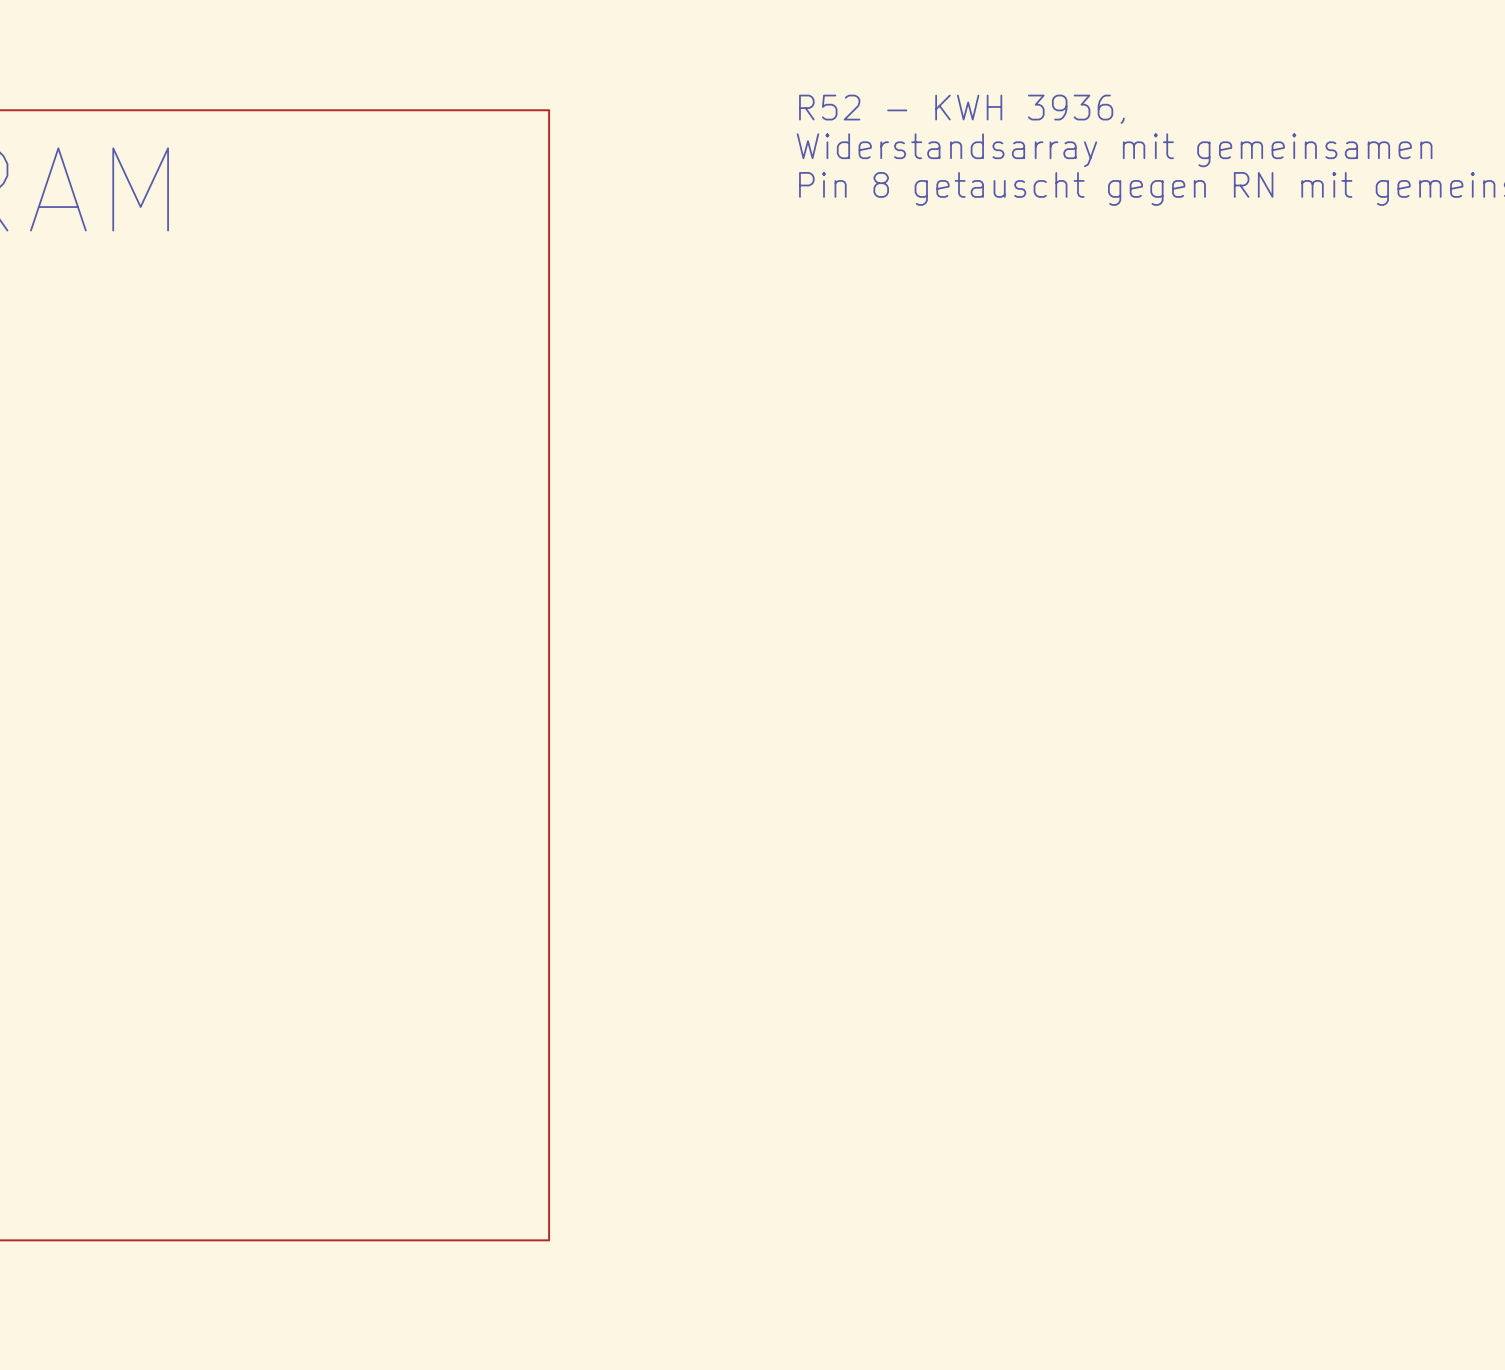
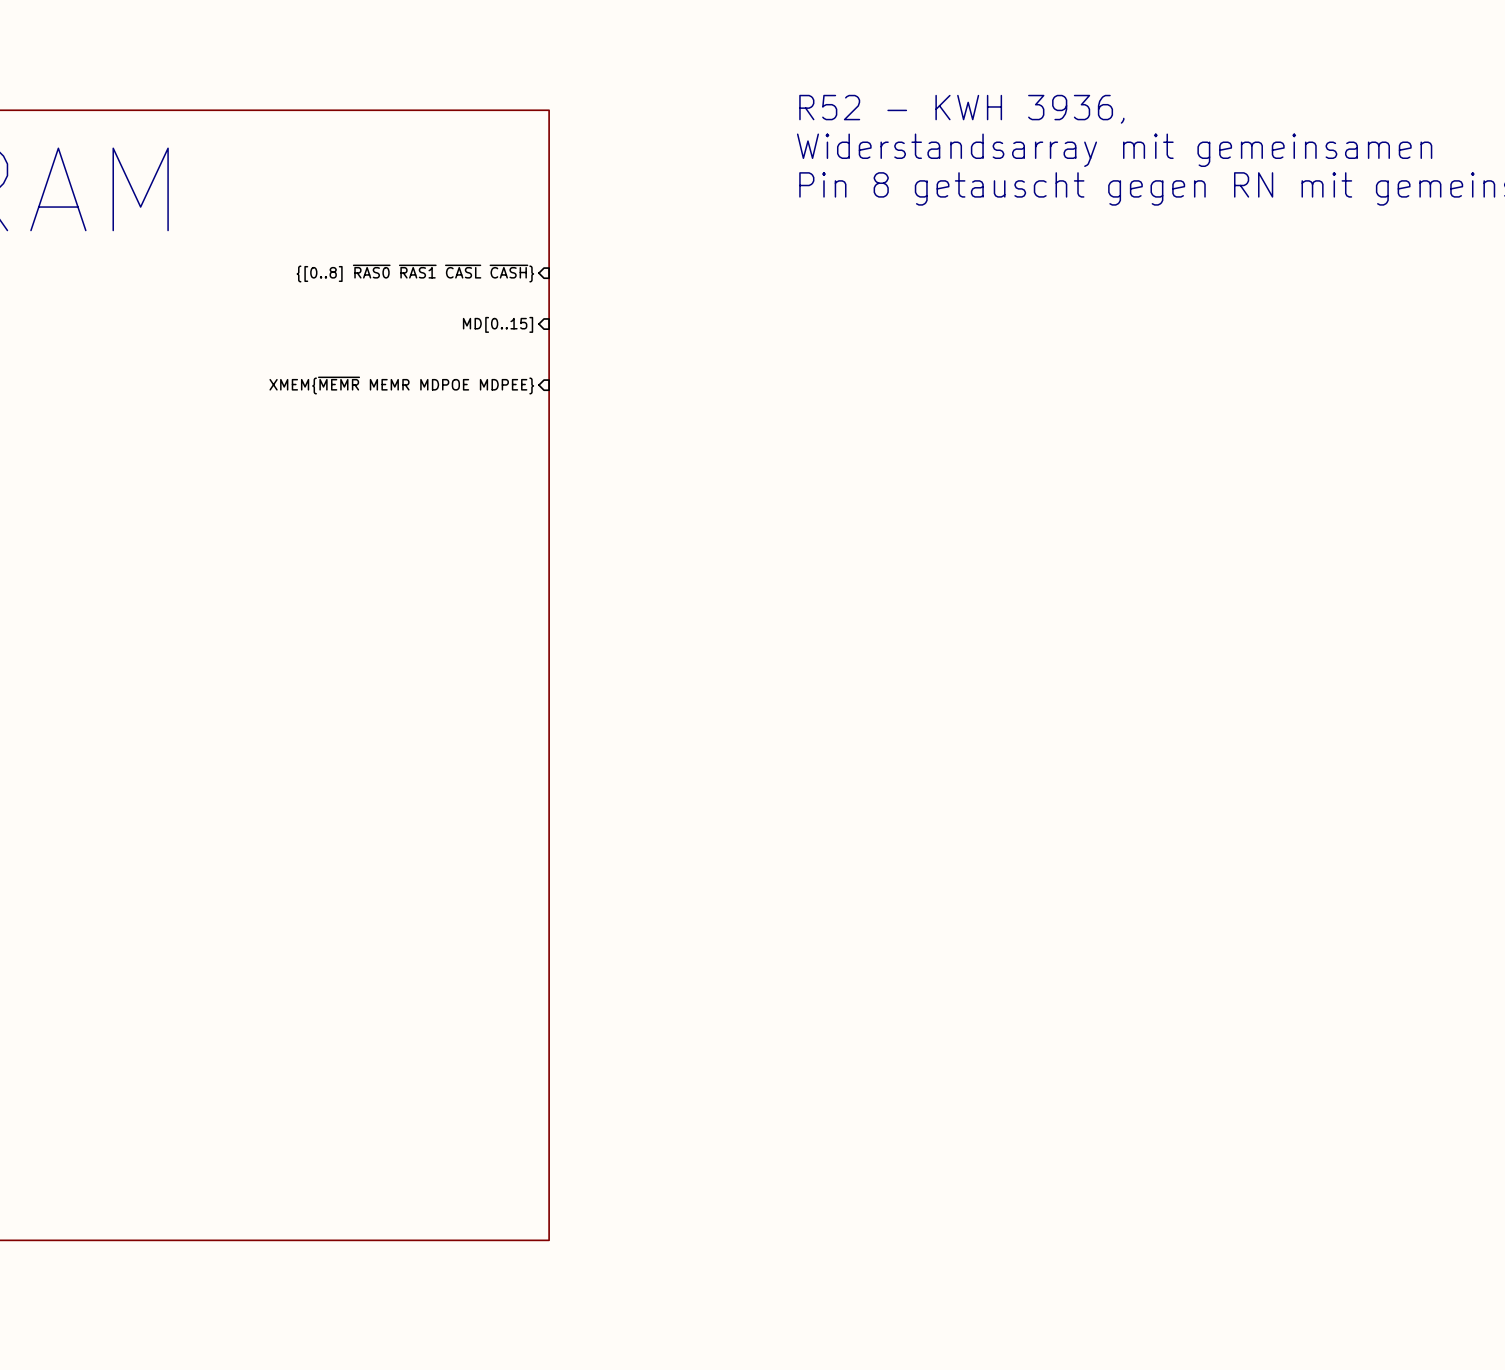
sheet pin: none -> {[0..8] ~{RAS0} ~{RAS1} ~{CASL} ~{CASH}} (415, 273)
sheet pin: none -> MD[0..15] (498, 324)
sheet pin: none -> XMEM{~{MEMR} MEMR MDPOE MDPEE} (401, 385)

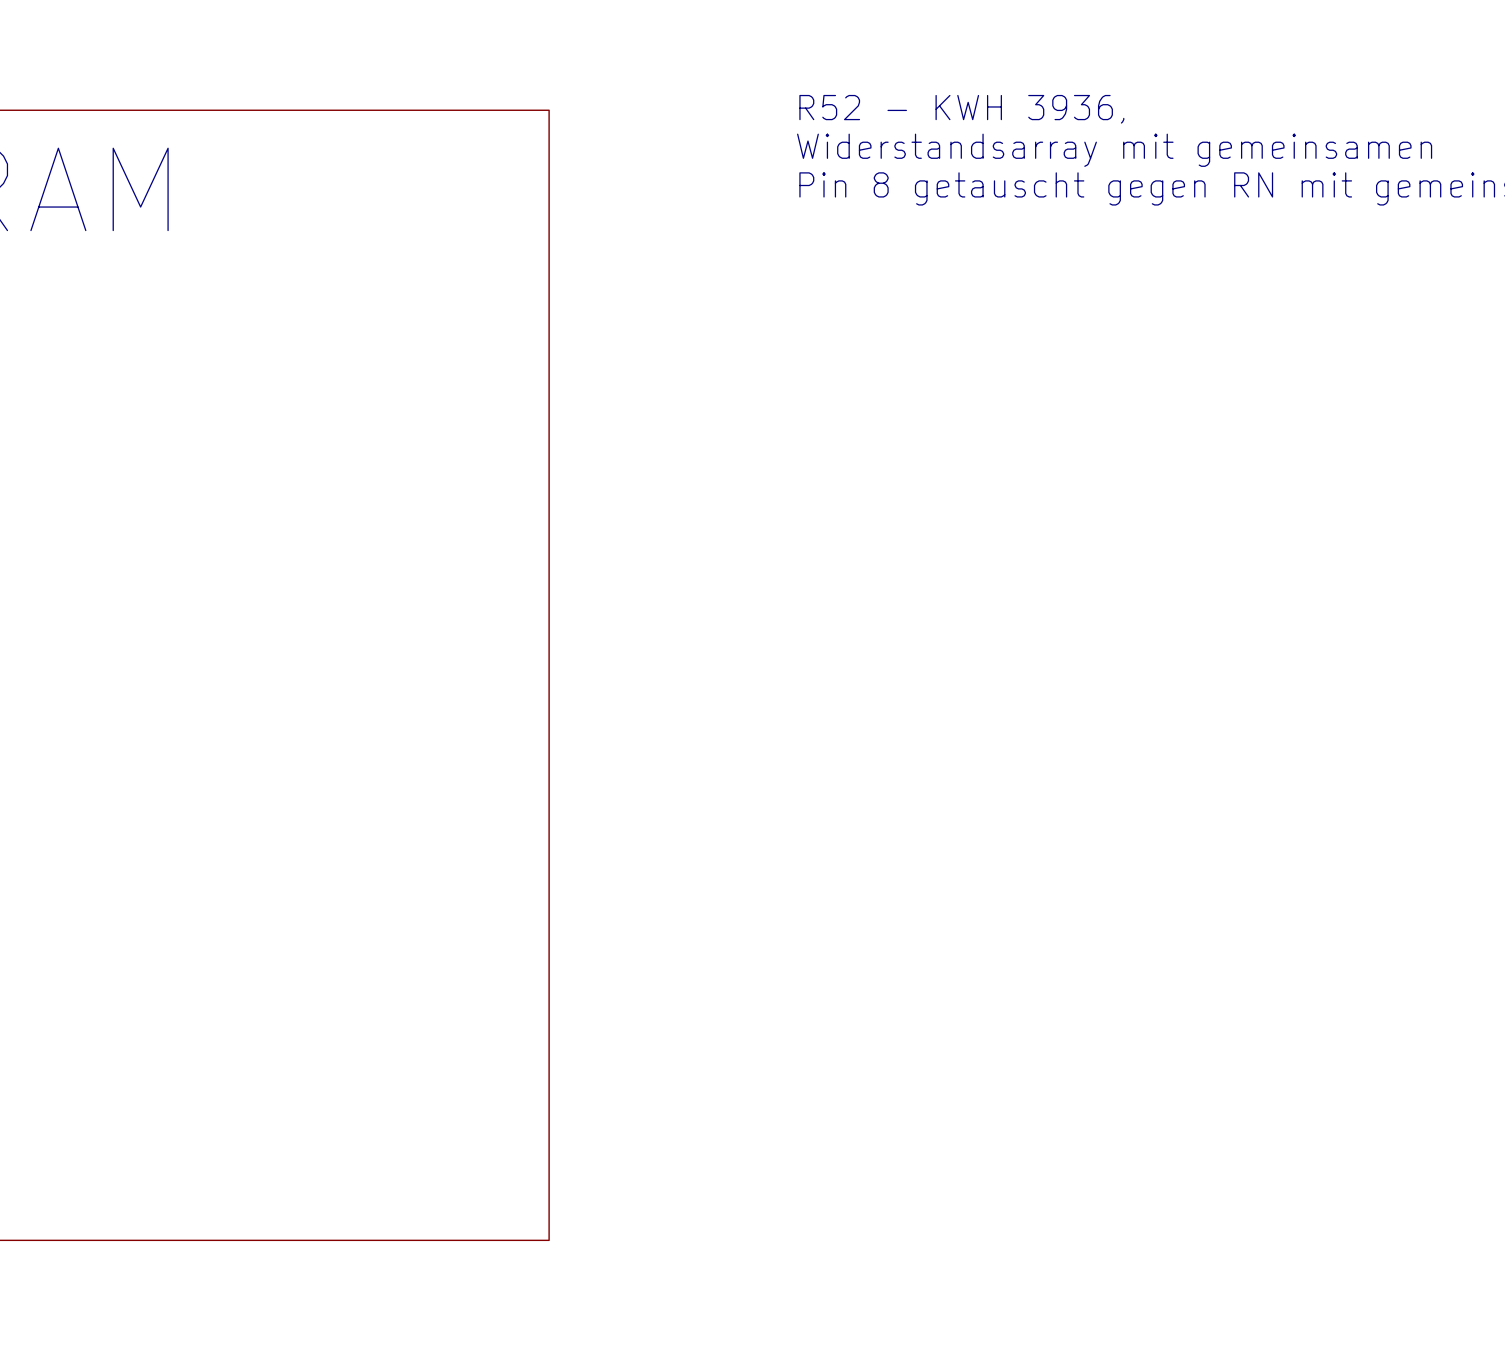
sheet pin: {[0..8] ~{RAS0} ~{RAS1} ~{CASL} ~{CASH}} (415, 273) -> none
sheet pin: MD[0..15] (498, 324) -> none
sheet pin: XMEM{~{MEMR} MEMR MDPOE MDPEE} (401, 385) -> none

